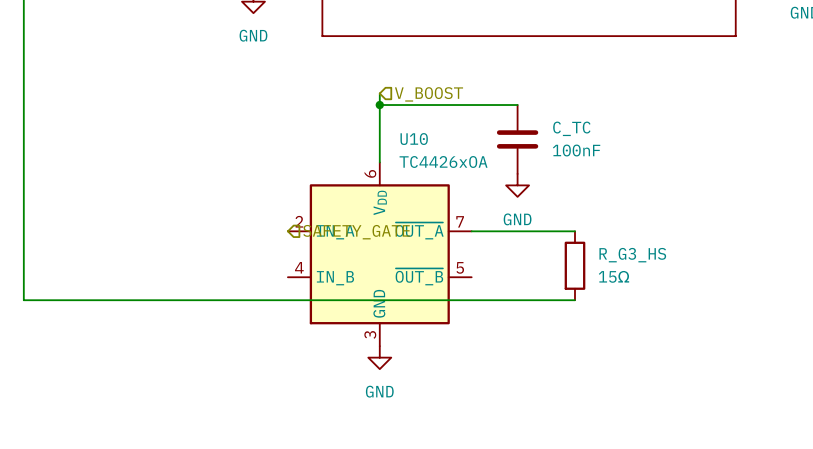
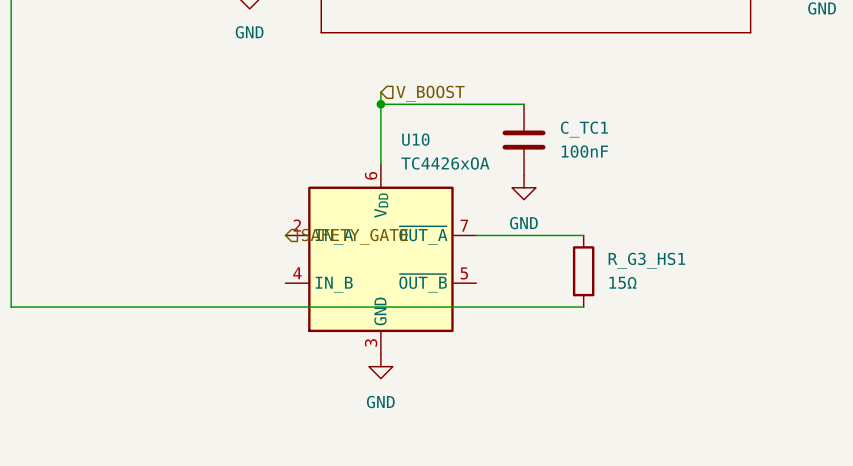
C_TC name: C_TC (571, 128) -> C_TC1 (584, 129)
R_G3_HS name: R_G3_HS (632, 255) -> R_G3_HS1 (646, 260)

